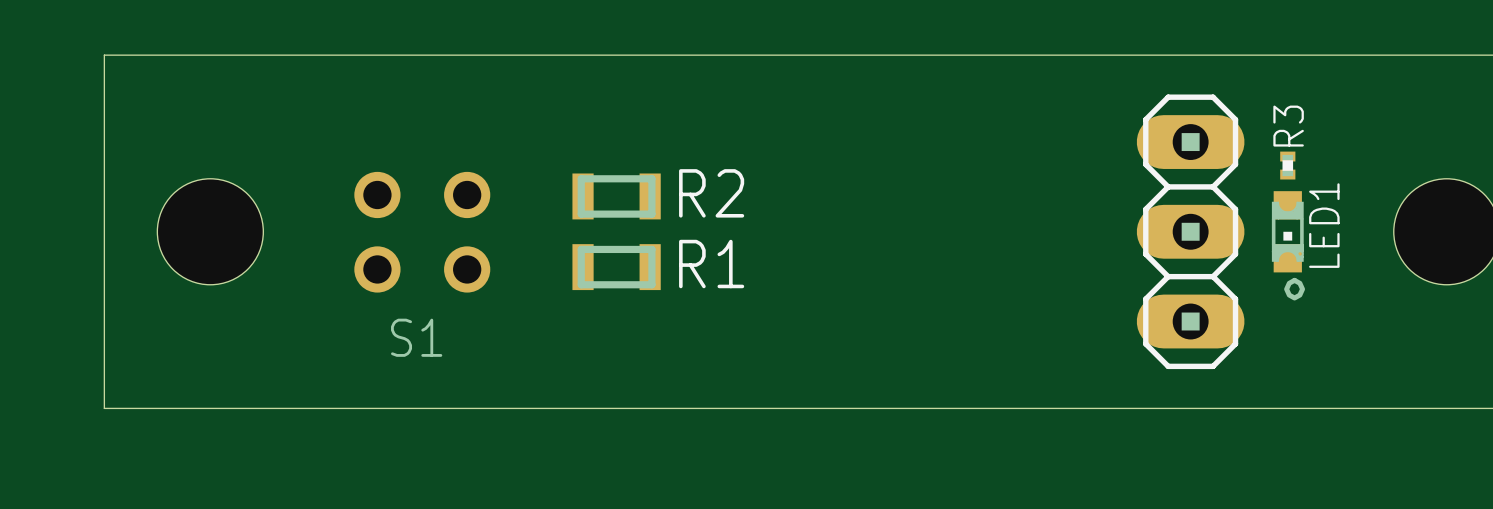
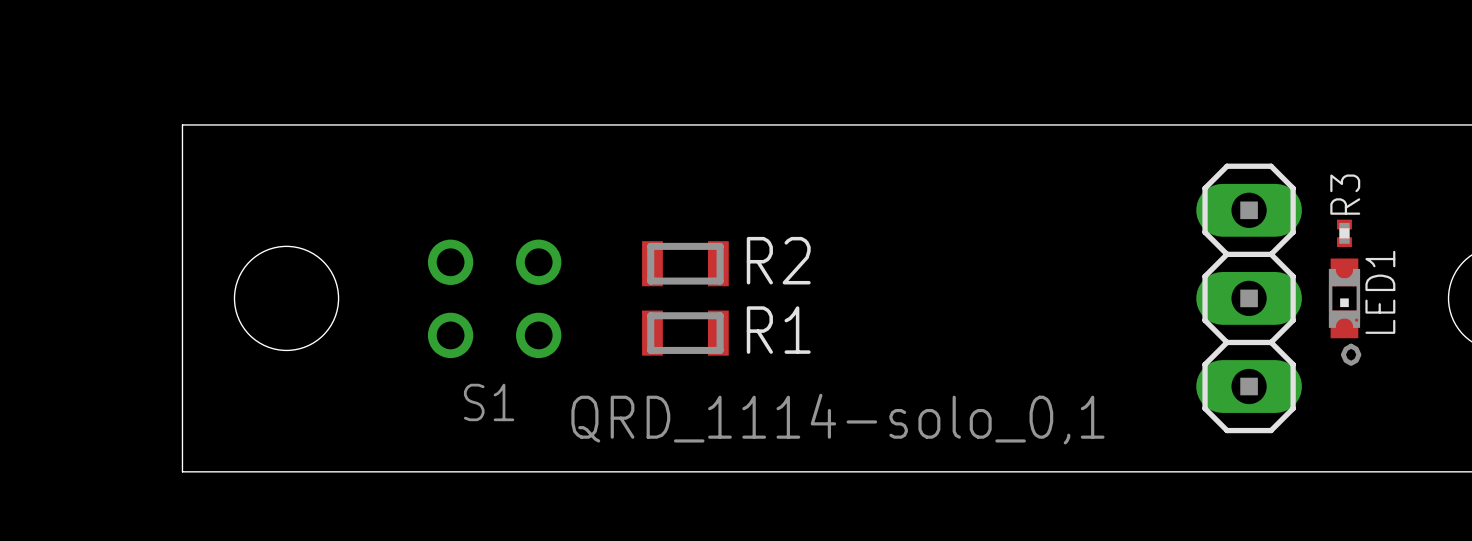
text: none -> QRD_1114-solo_0,1 (837, 419)

